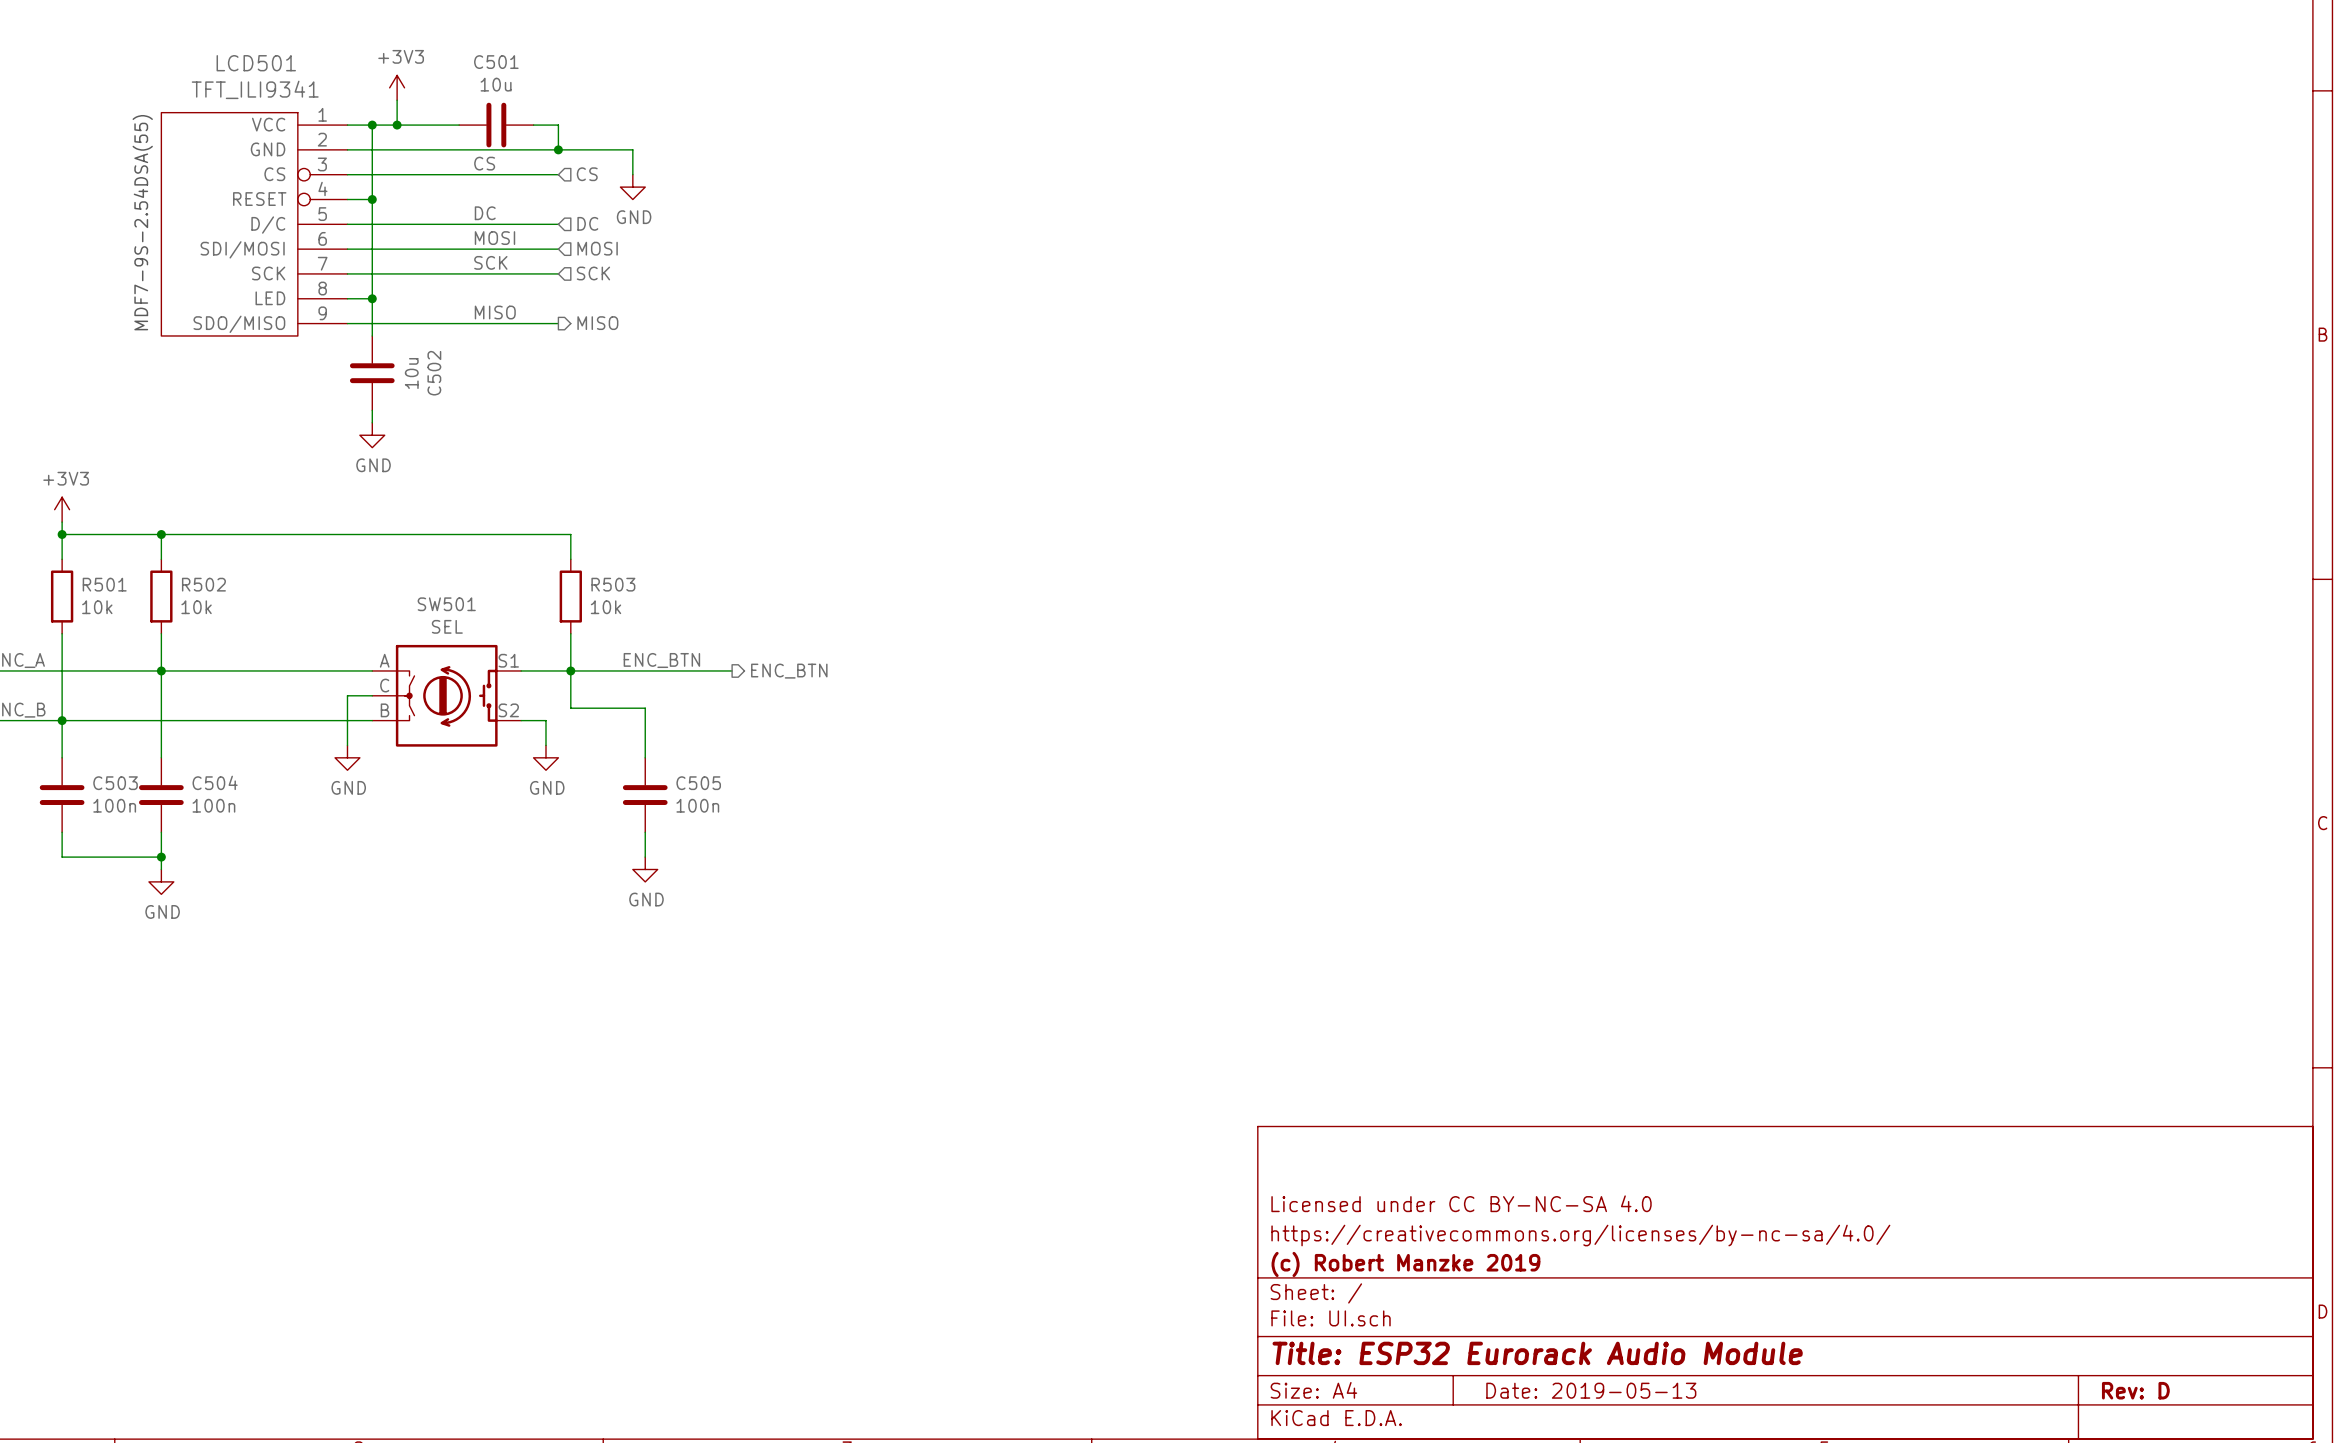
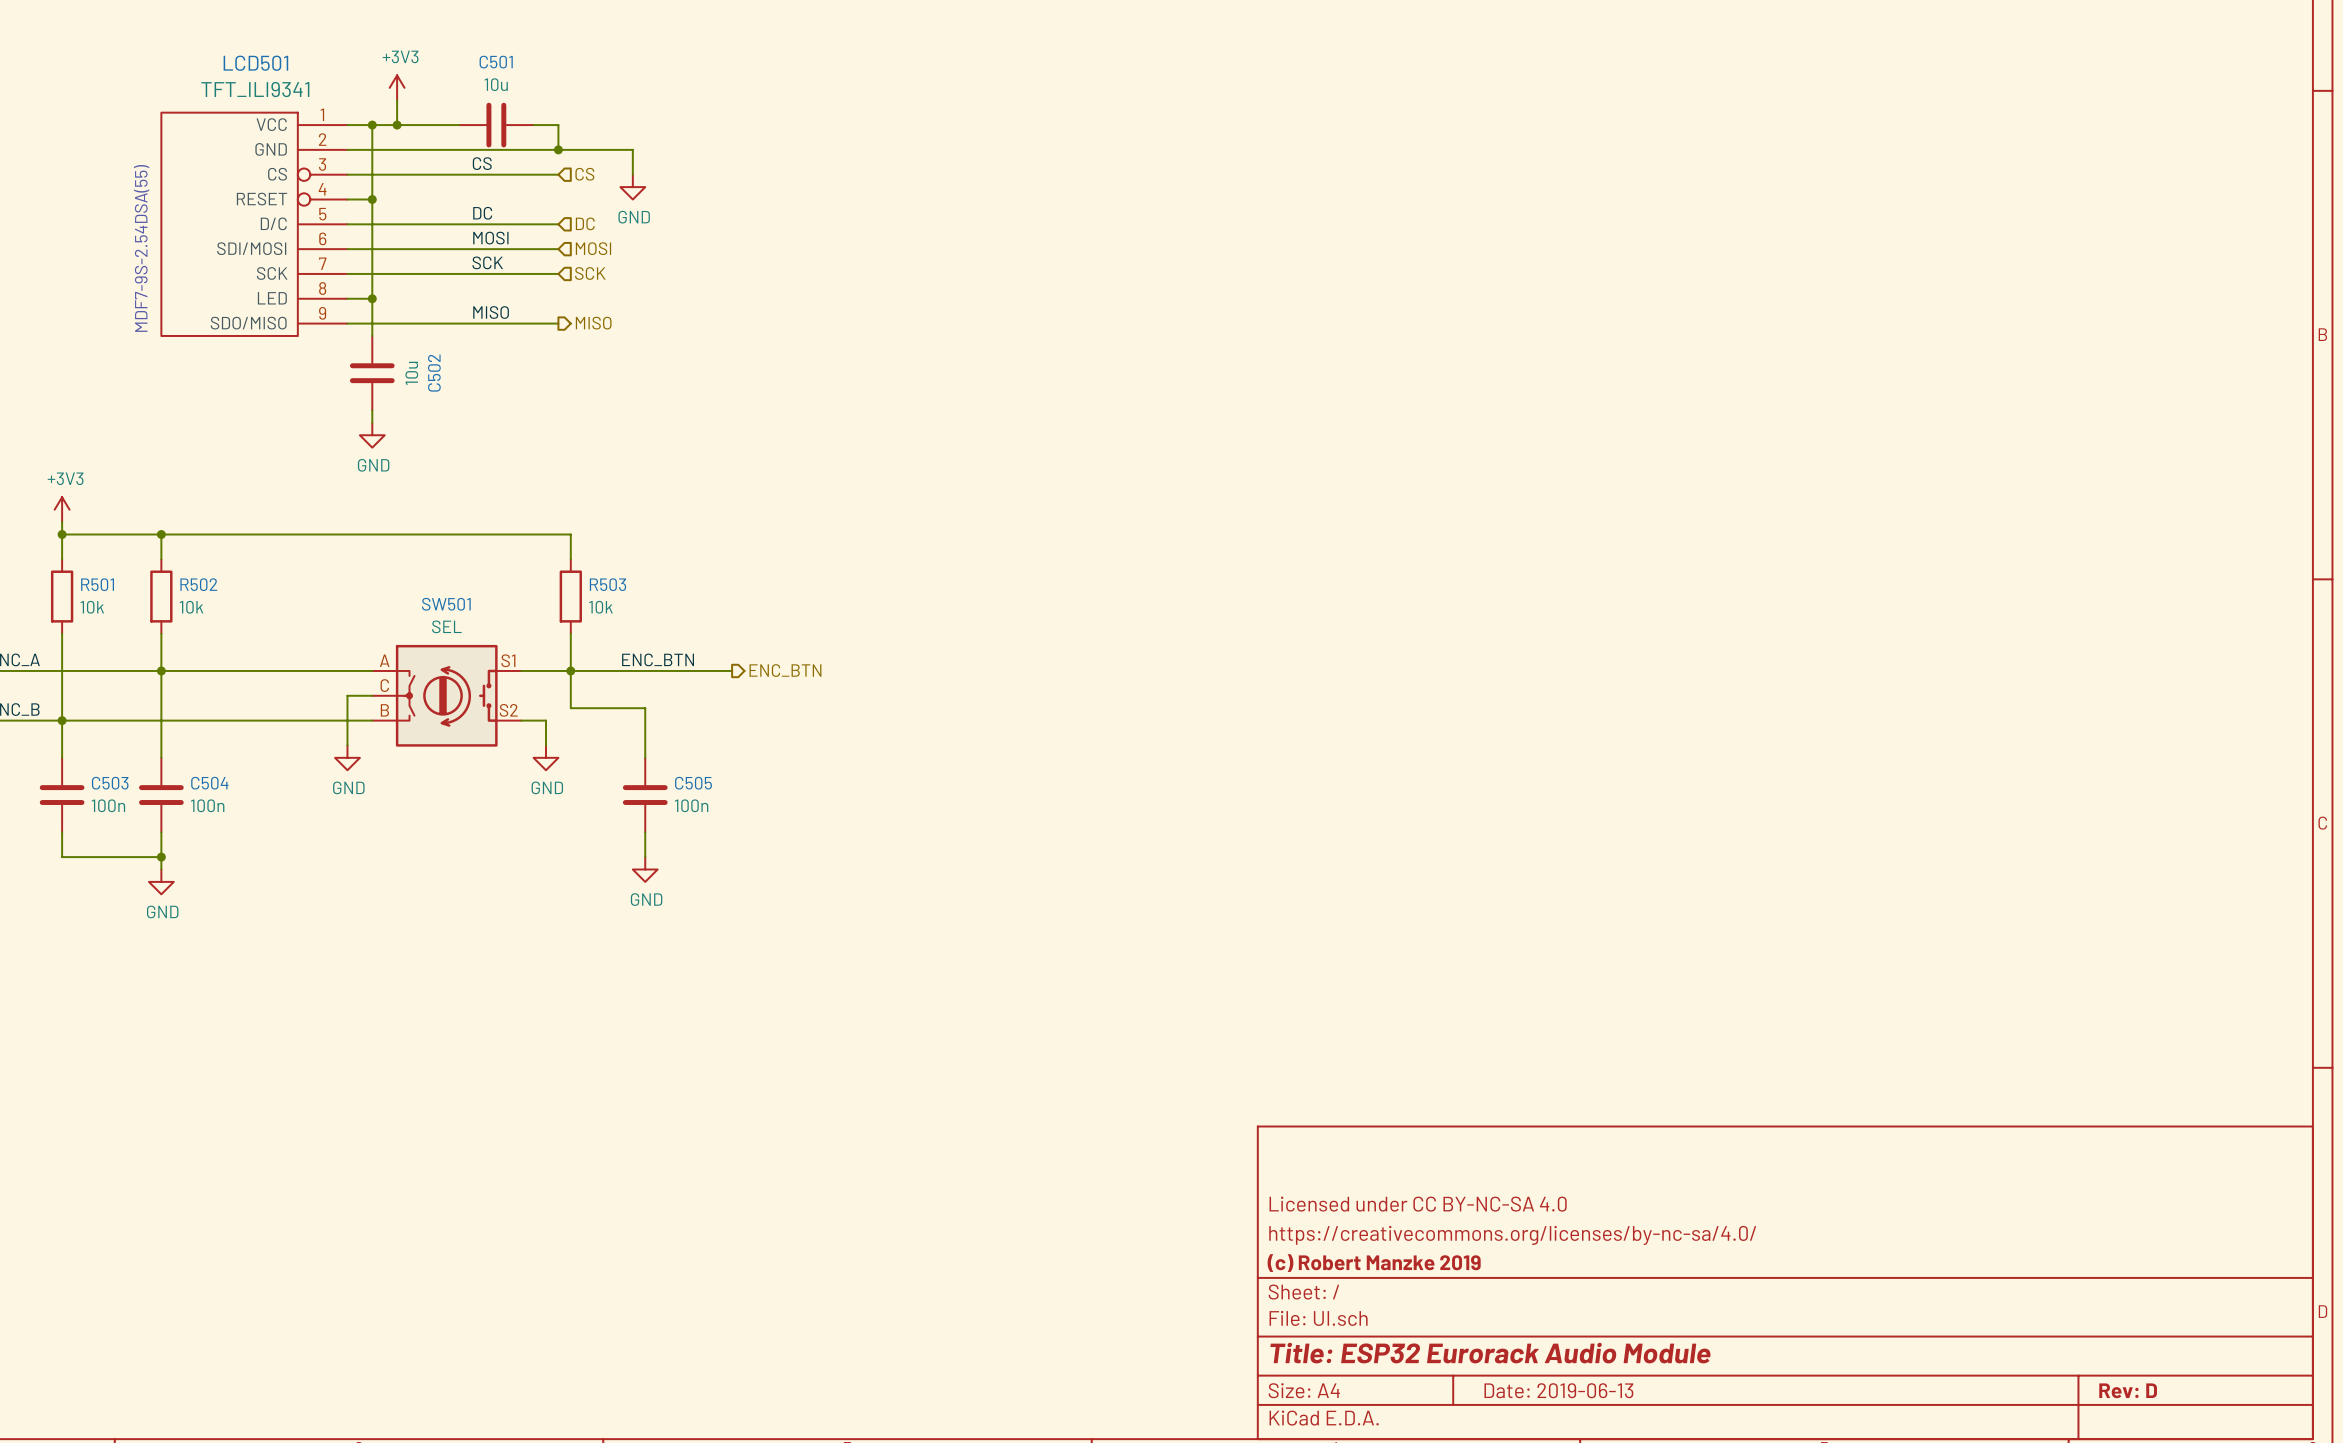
title block: Date: 2019-05-13 (1591, 1390) -> Date: 2019-06-13 (1558, 1390)

